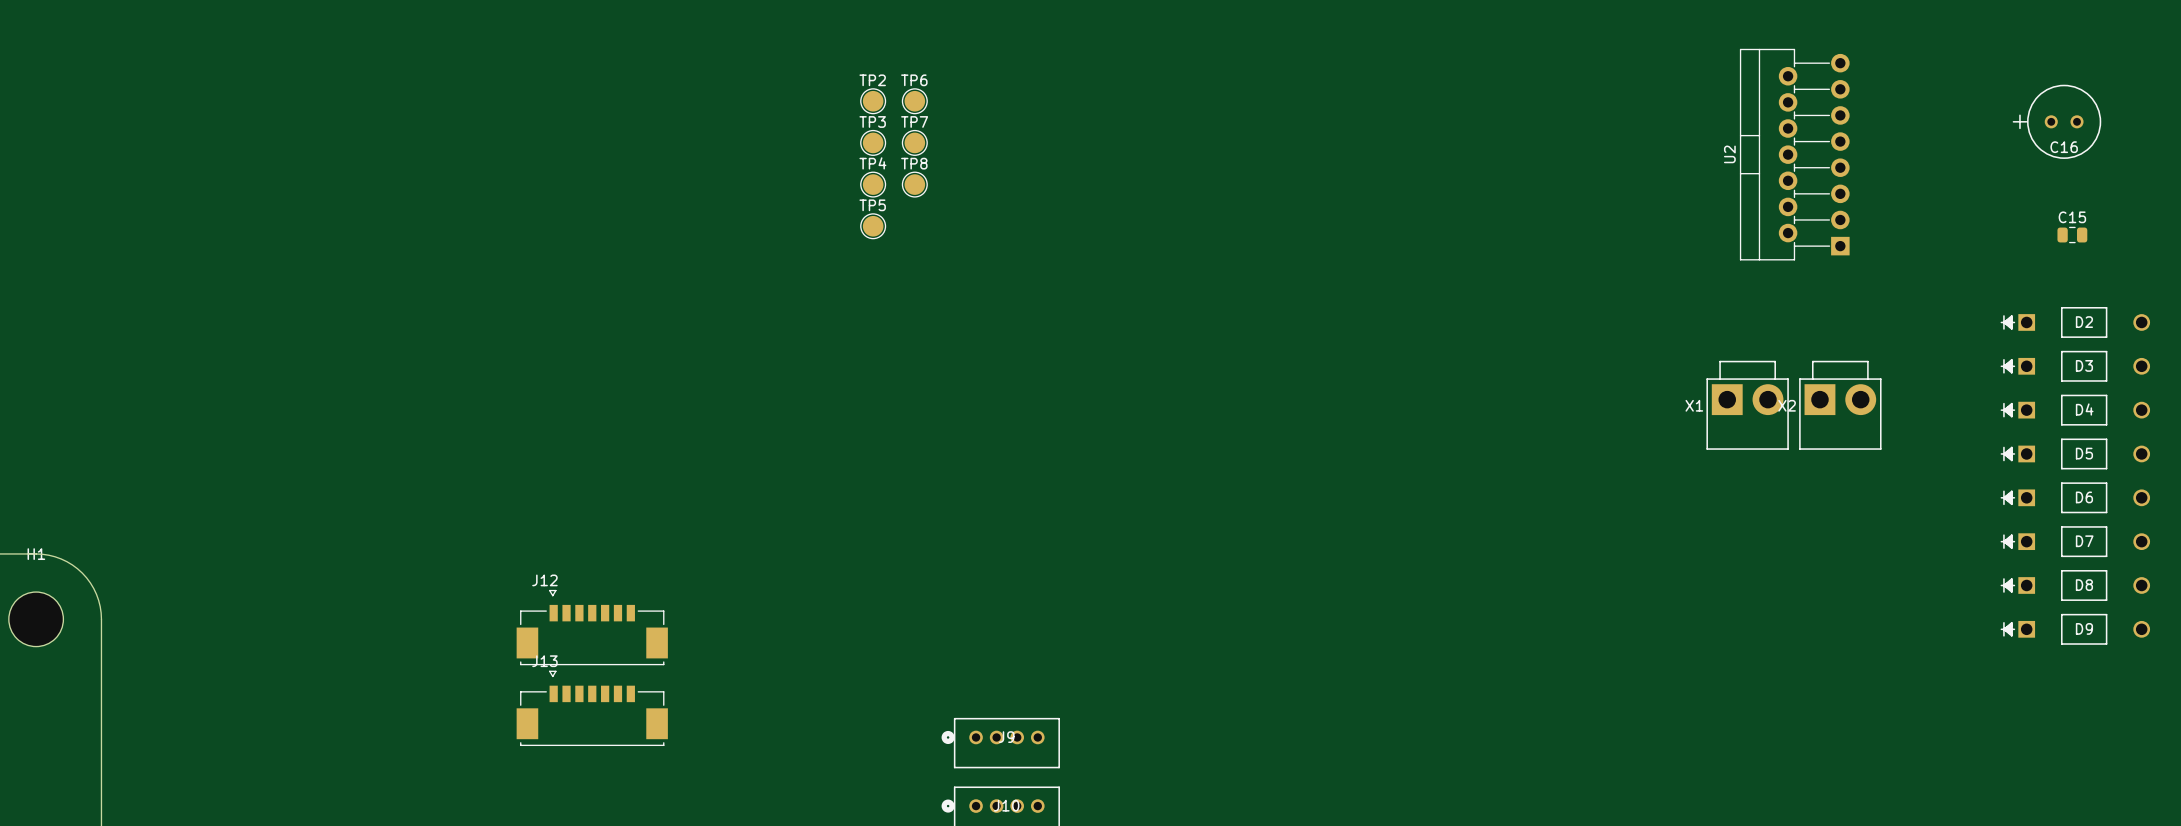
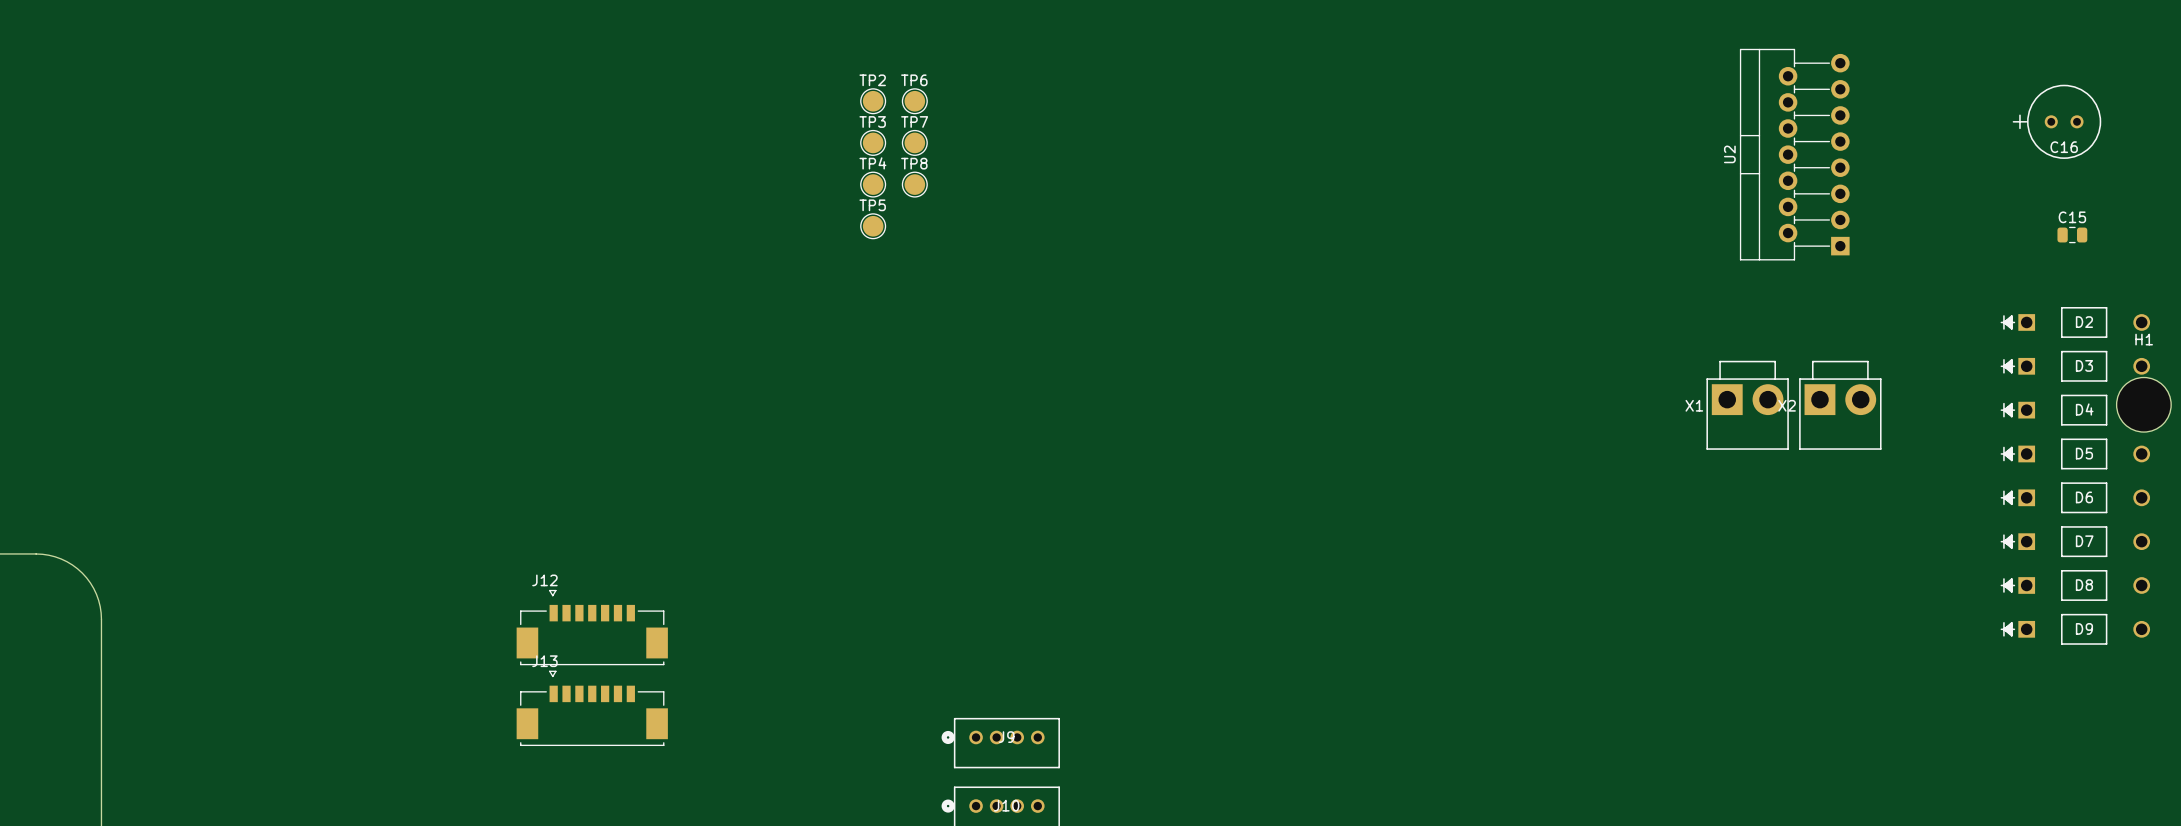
H1 position: (36, 619) -> (2143, 404)

